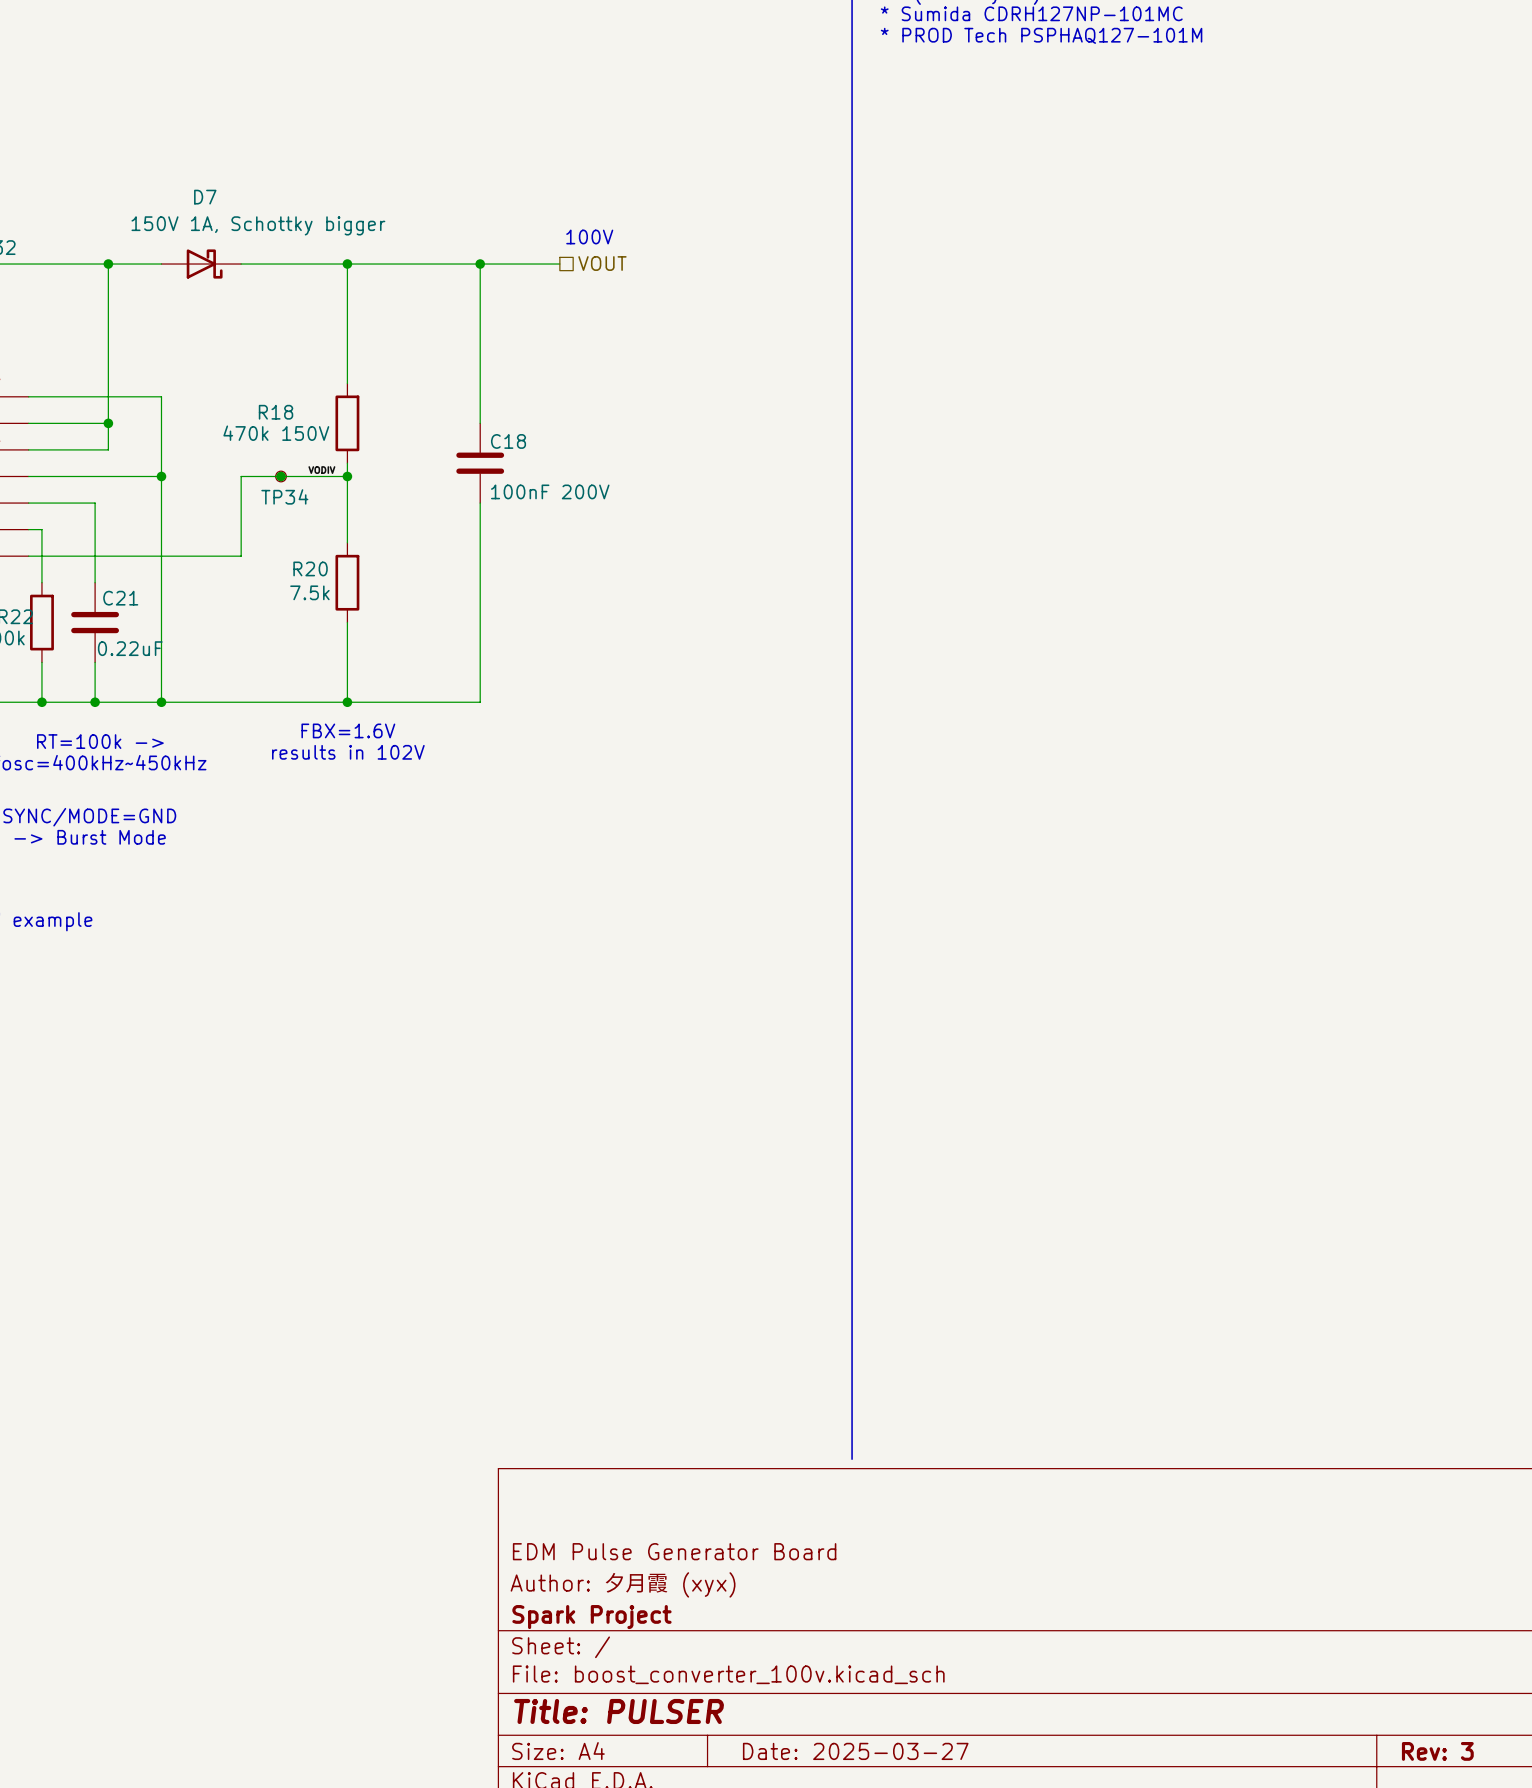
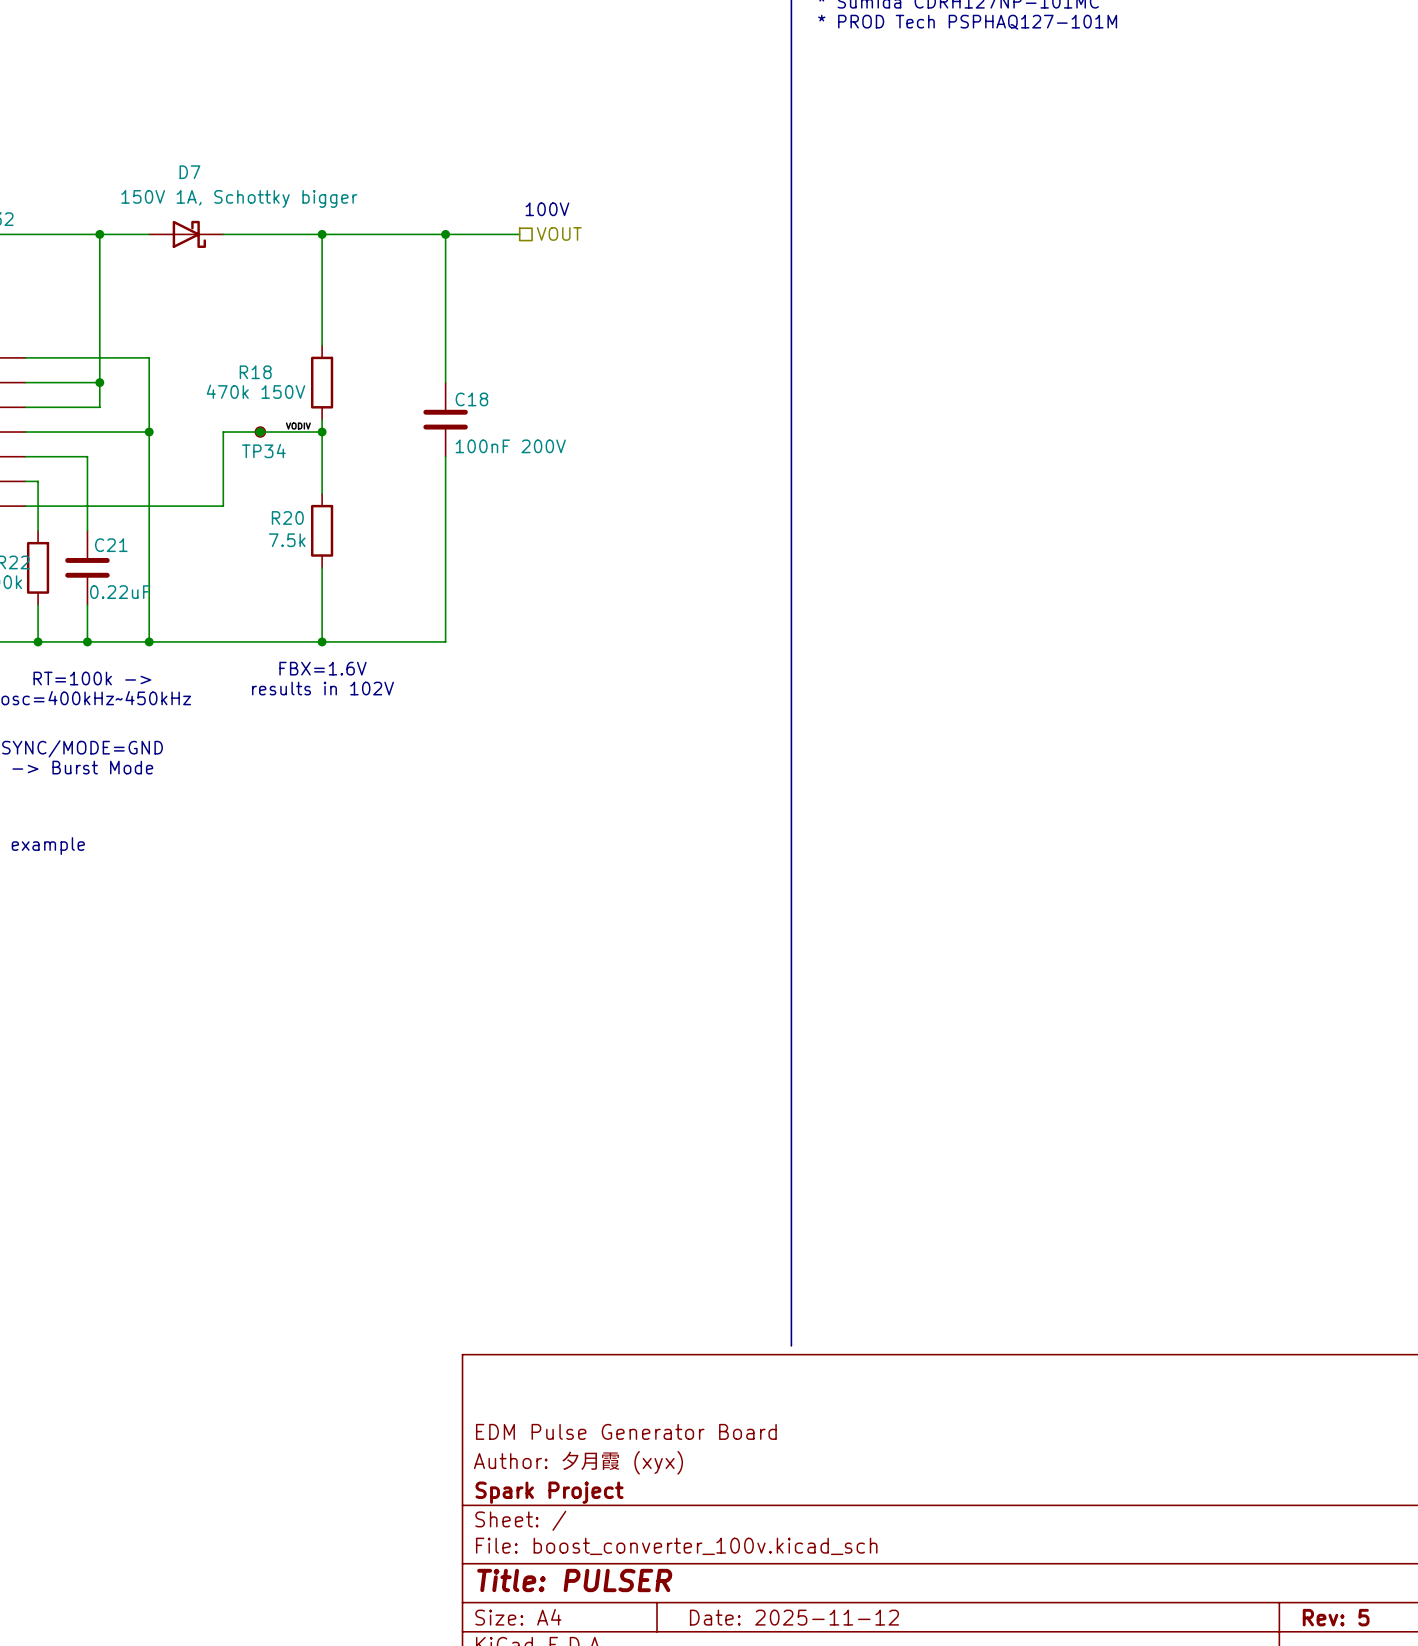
title block: Date: 2025-03-27 (855, 1751) -> Date: 2025-11-12 (794, 1617)
title block: Rev: 3 (1437, 1751) -> Rev: 5 (1336, 1617)

